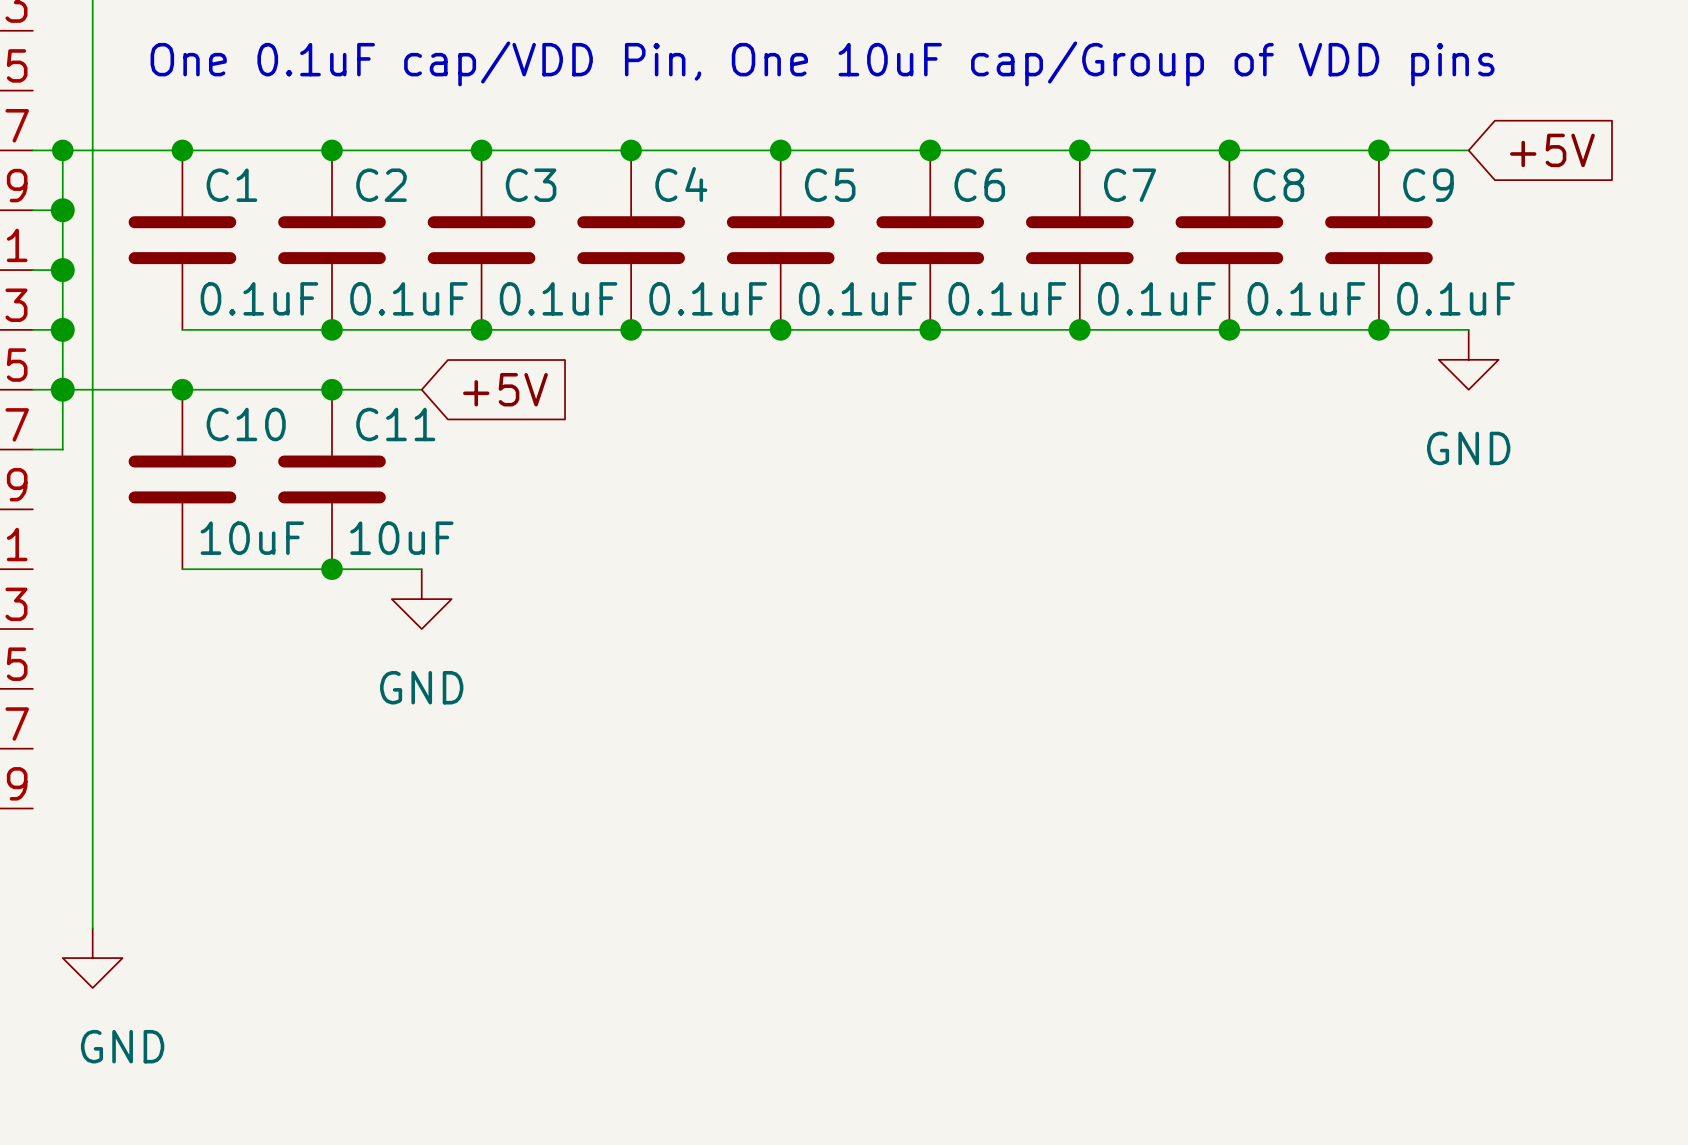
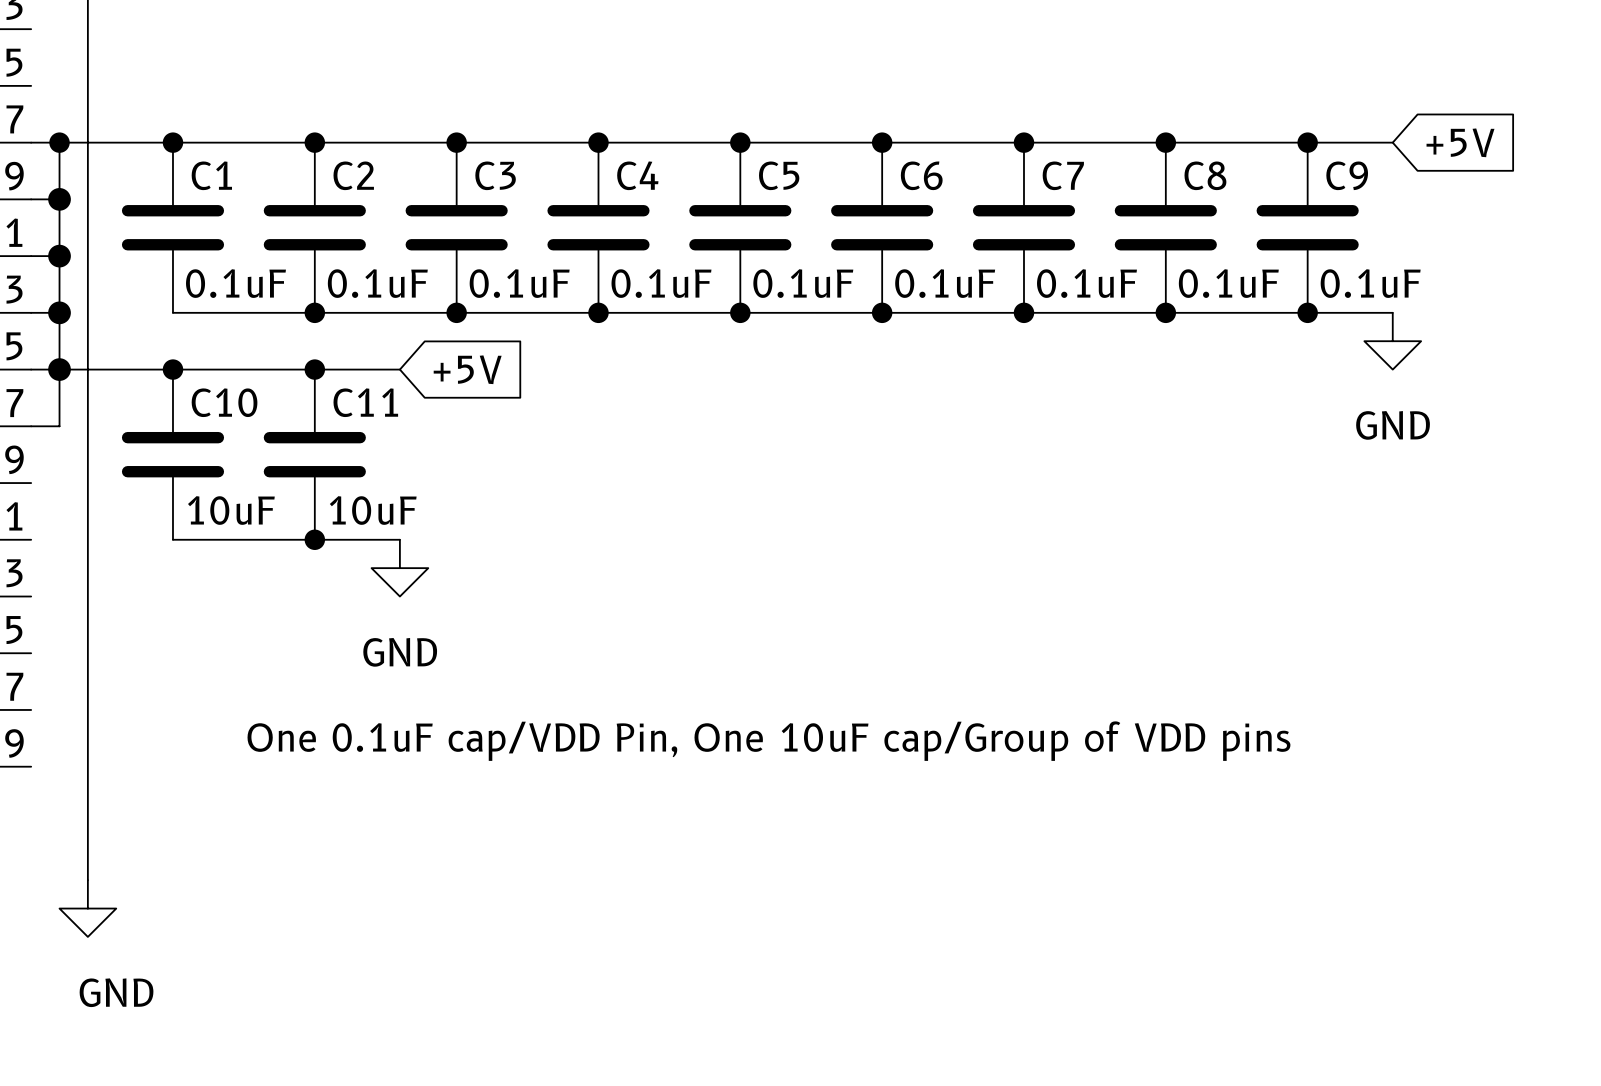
text: One 0.1uF cap/VDD Pin, One 10uF cap/Group of VDD pins (822, 63) -> none
text: none -> One 0.1uF cap/VDD Pin, One 10uF cap/Group of VDD pins (768, 741)

